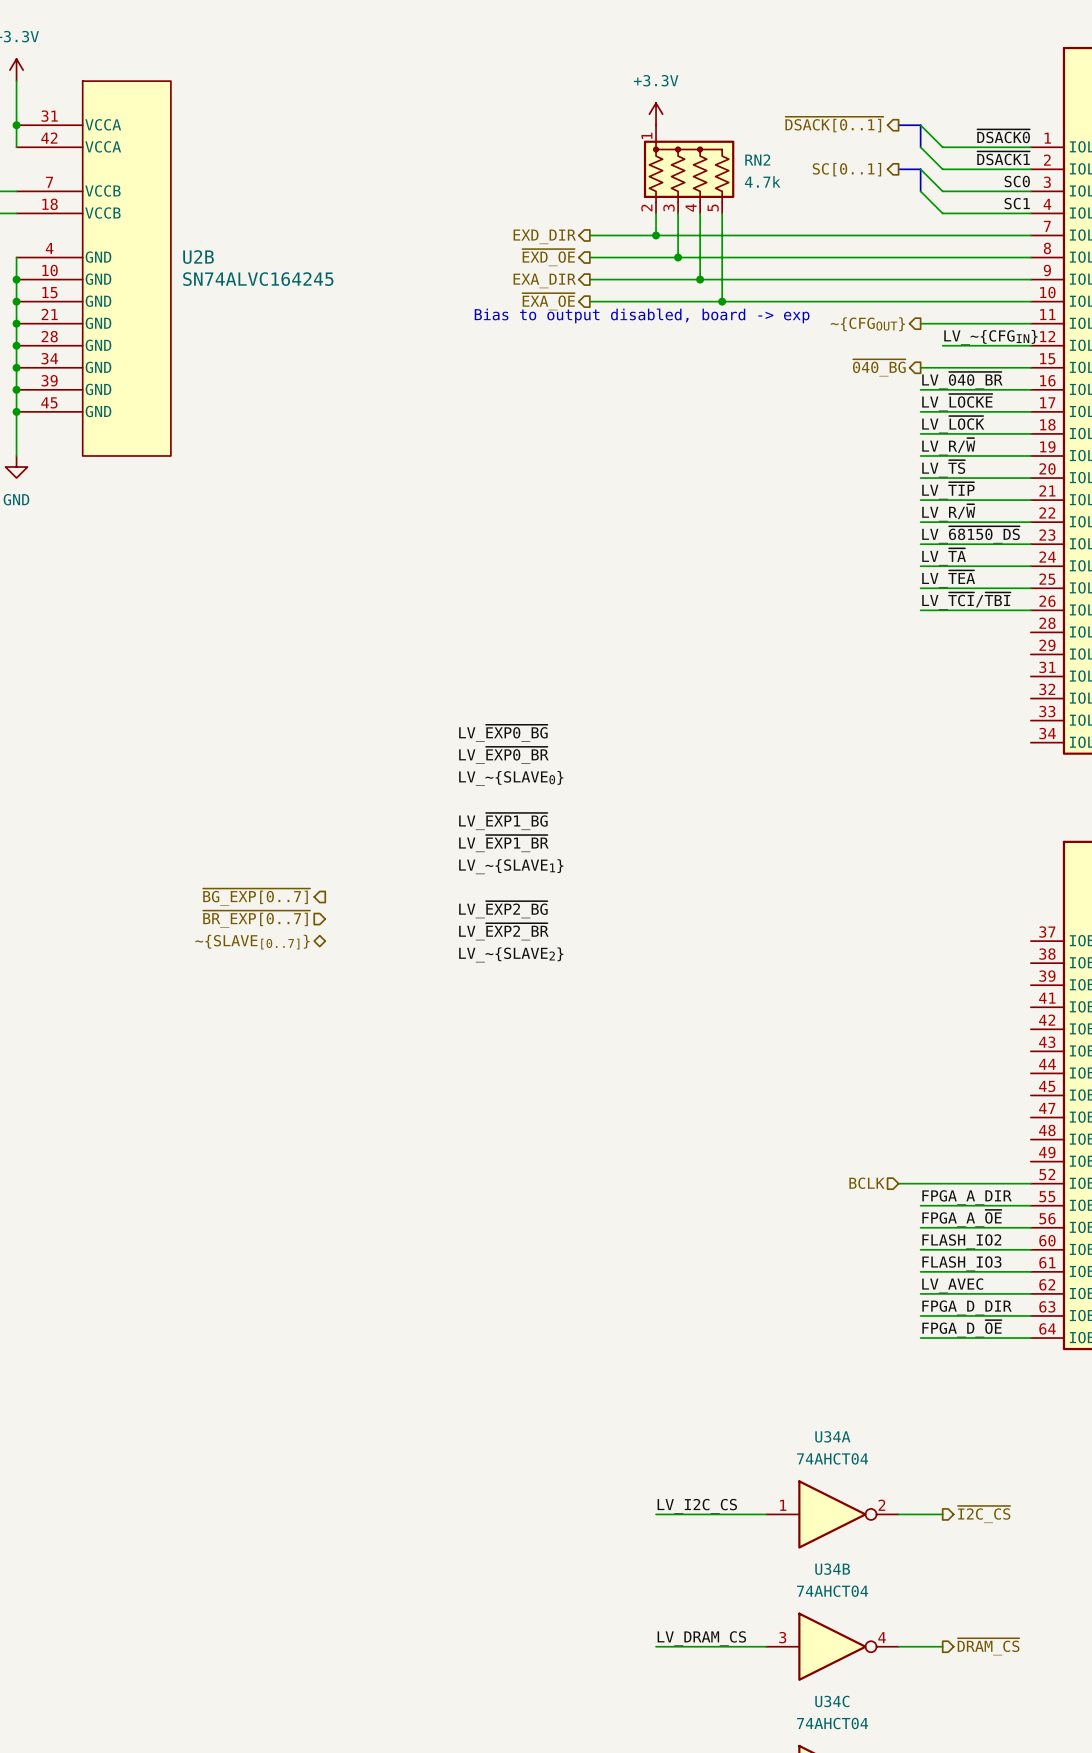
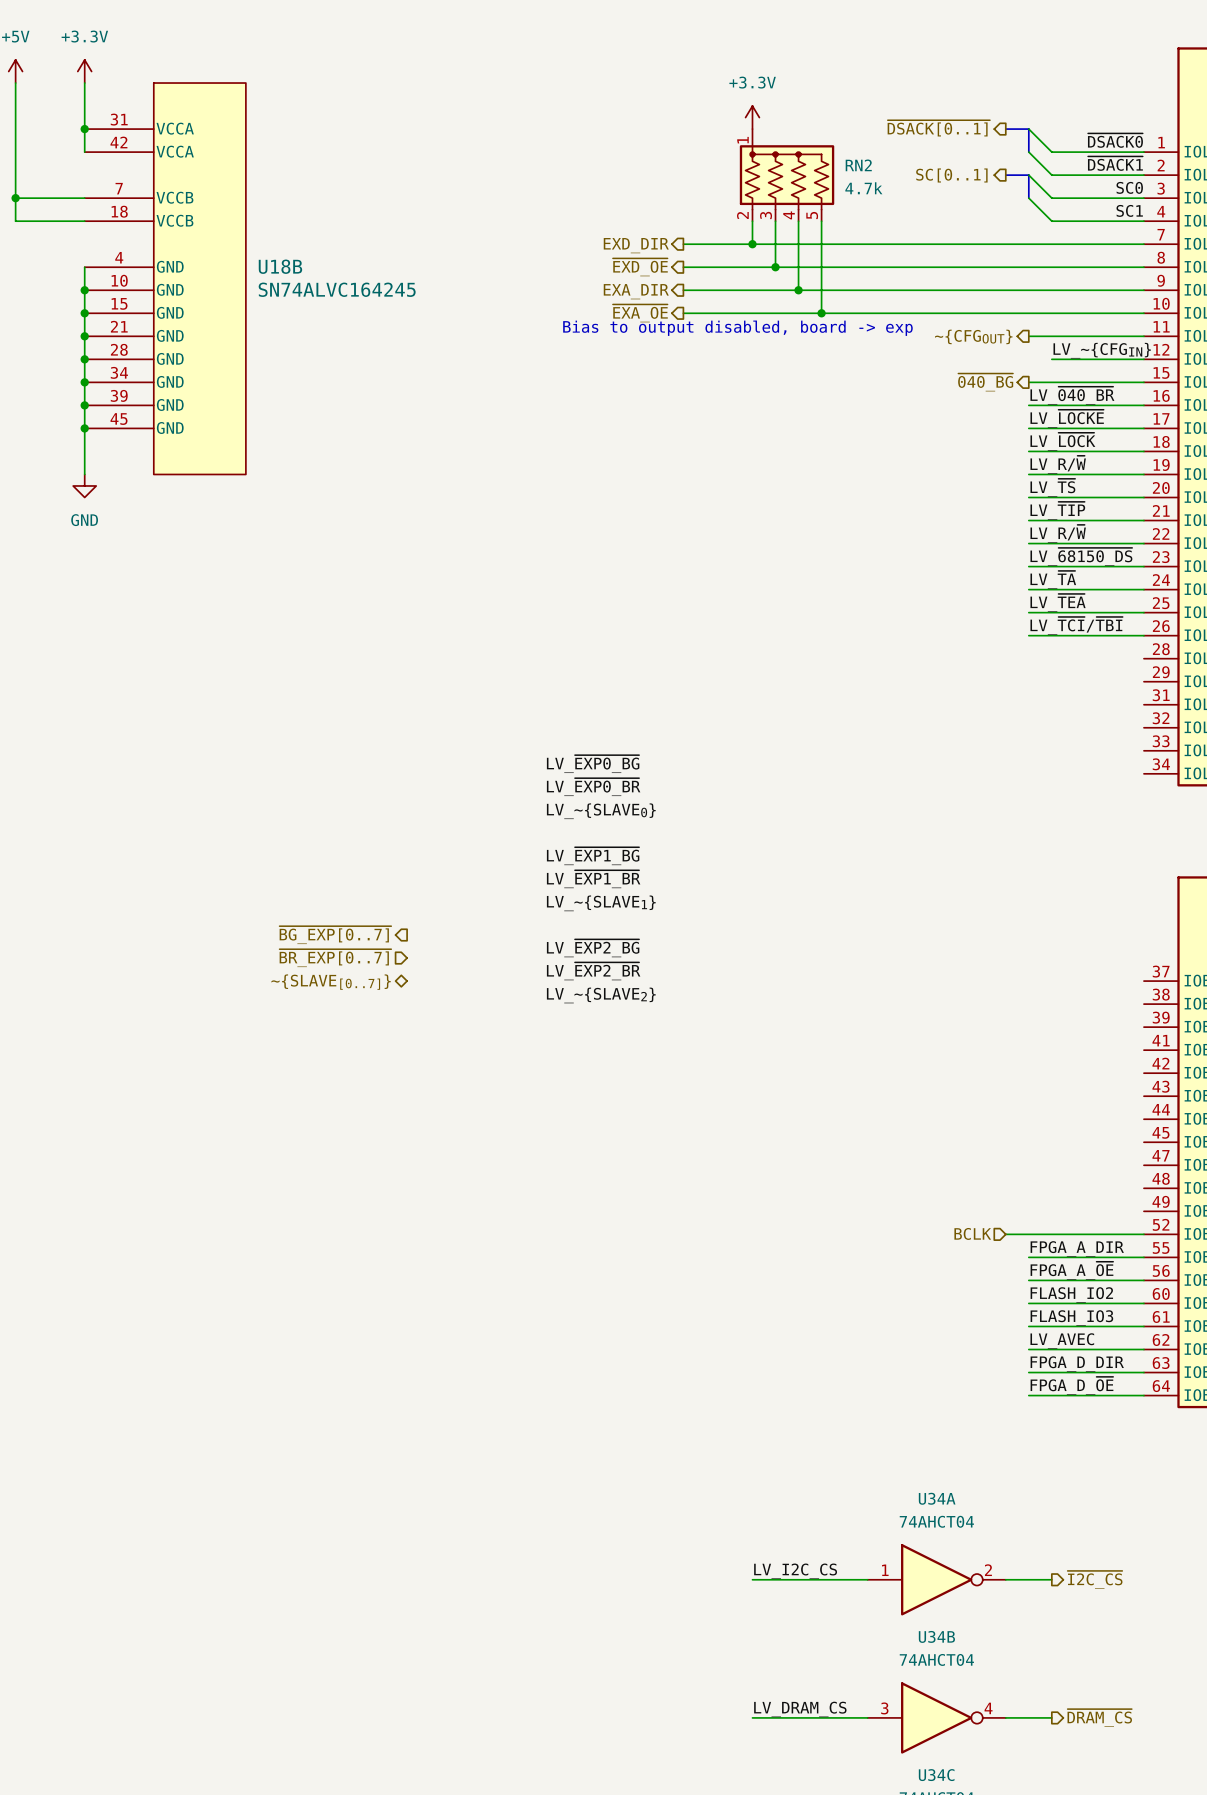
U2B name: U2B (198, 257) -> U18B (280, 266)

